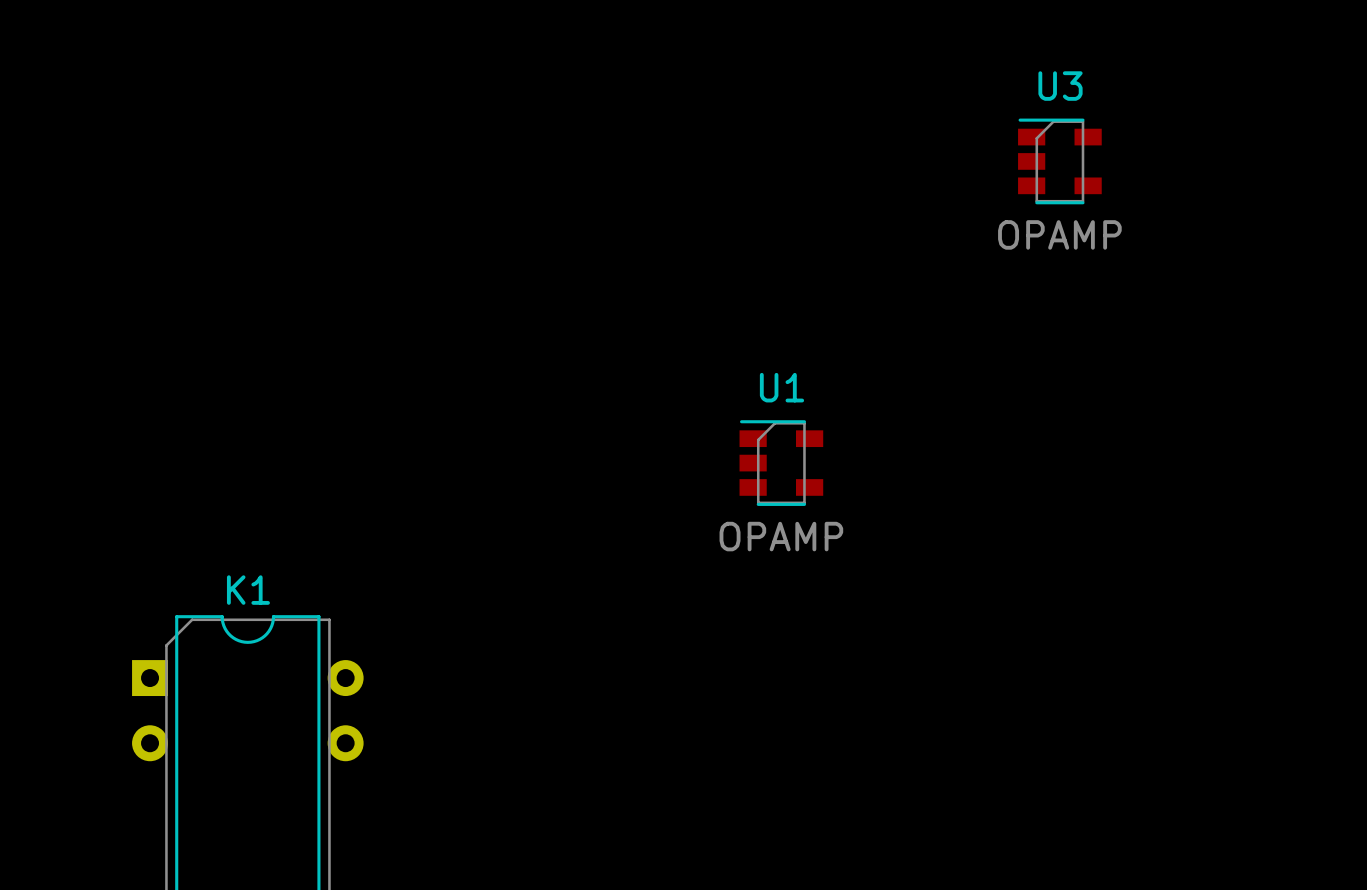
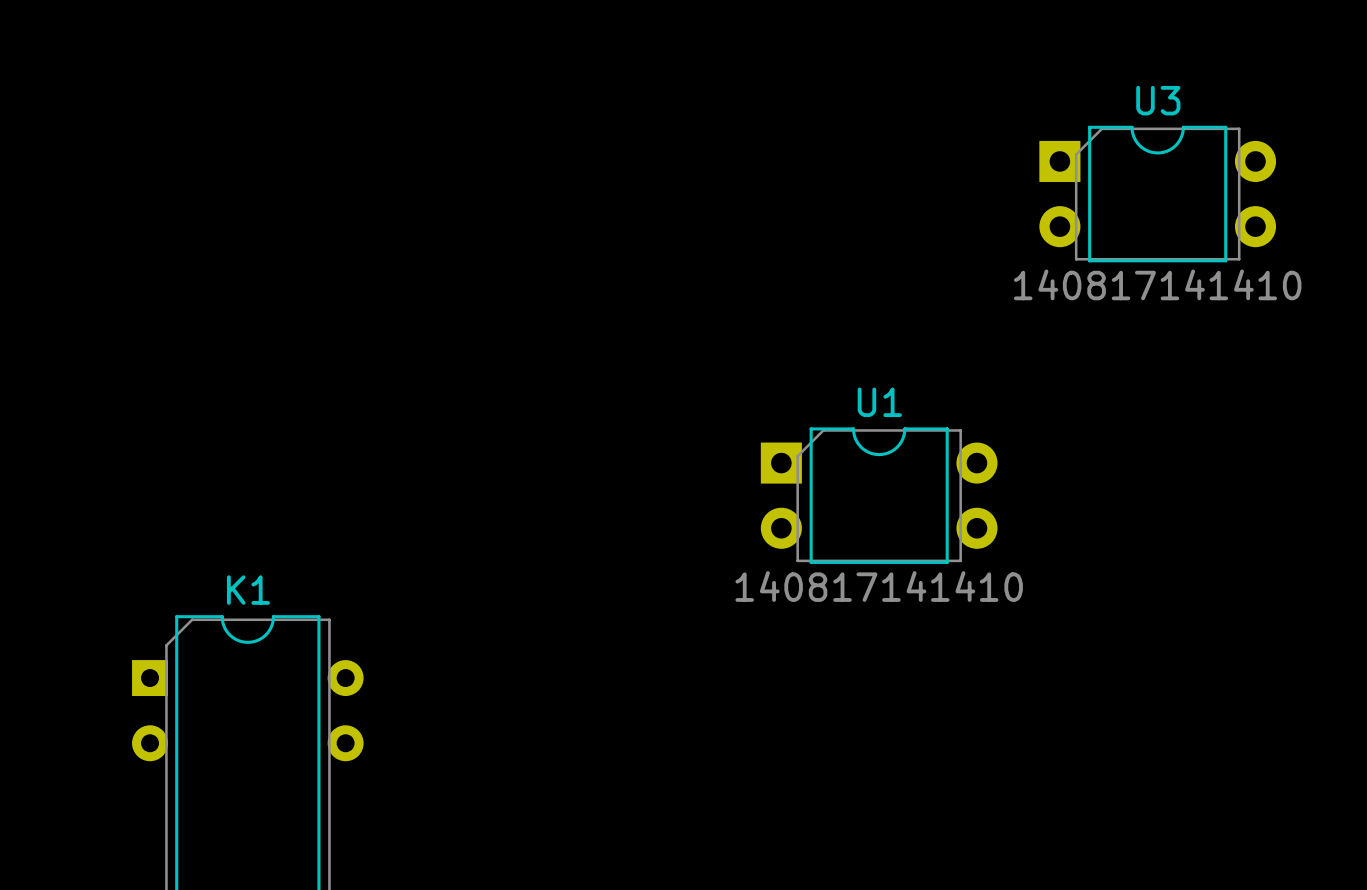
U3 footprint: [1018, 118, 1102, 205] -> [1039, 125, 1277, 263]
U3 value: OPAMP (1059, 234) -> 140817141410 (1157, 284)
U1 footprint: [739, 420, 824, 506] -> [760, 427, 998, 564]
U1 value: OPAMP (781, 536) -> 140817141410 (879, 586)

